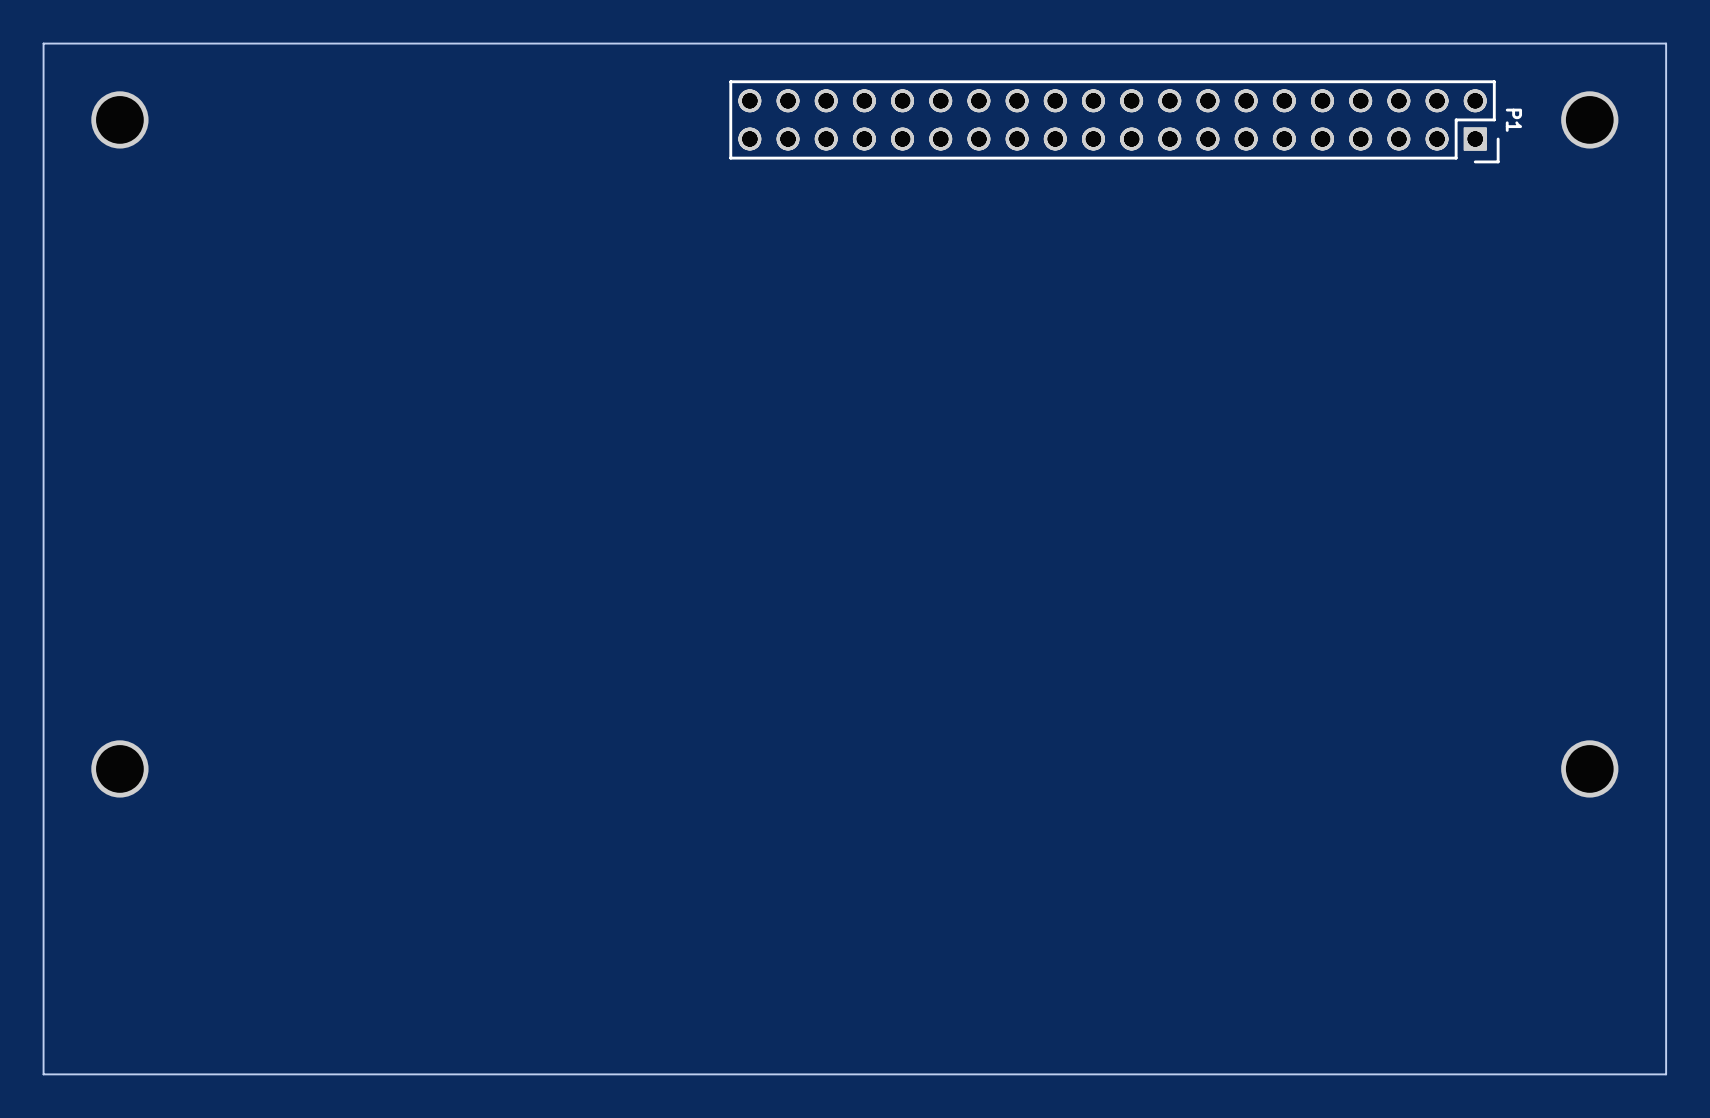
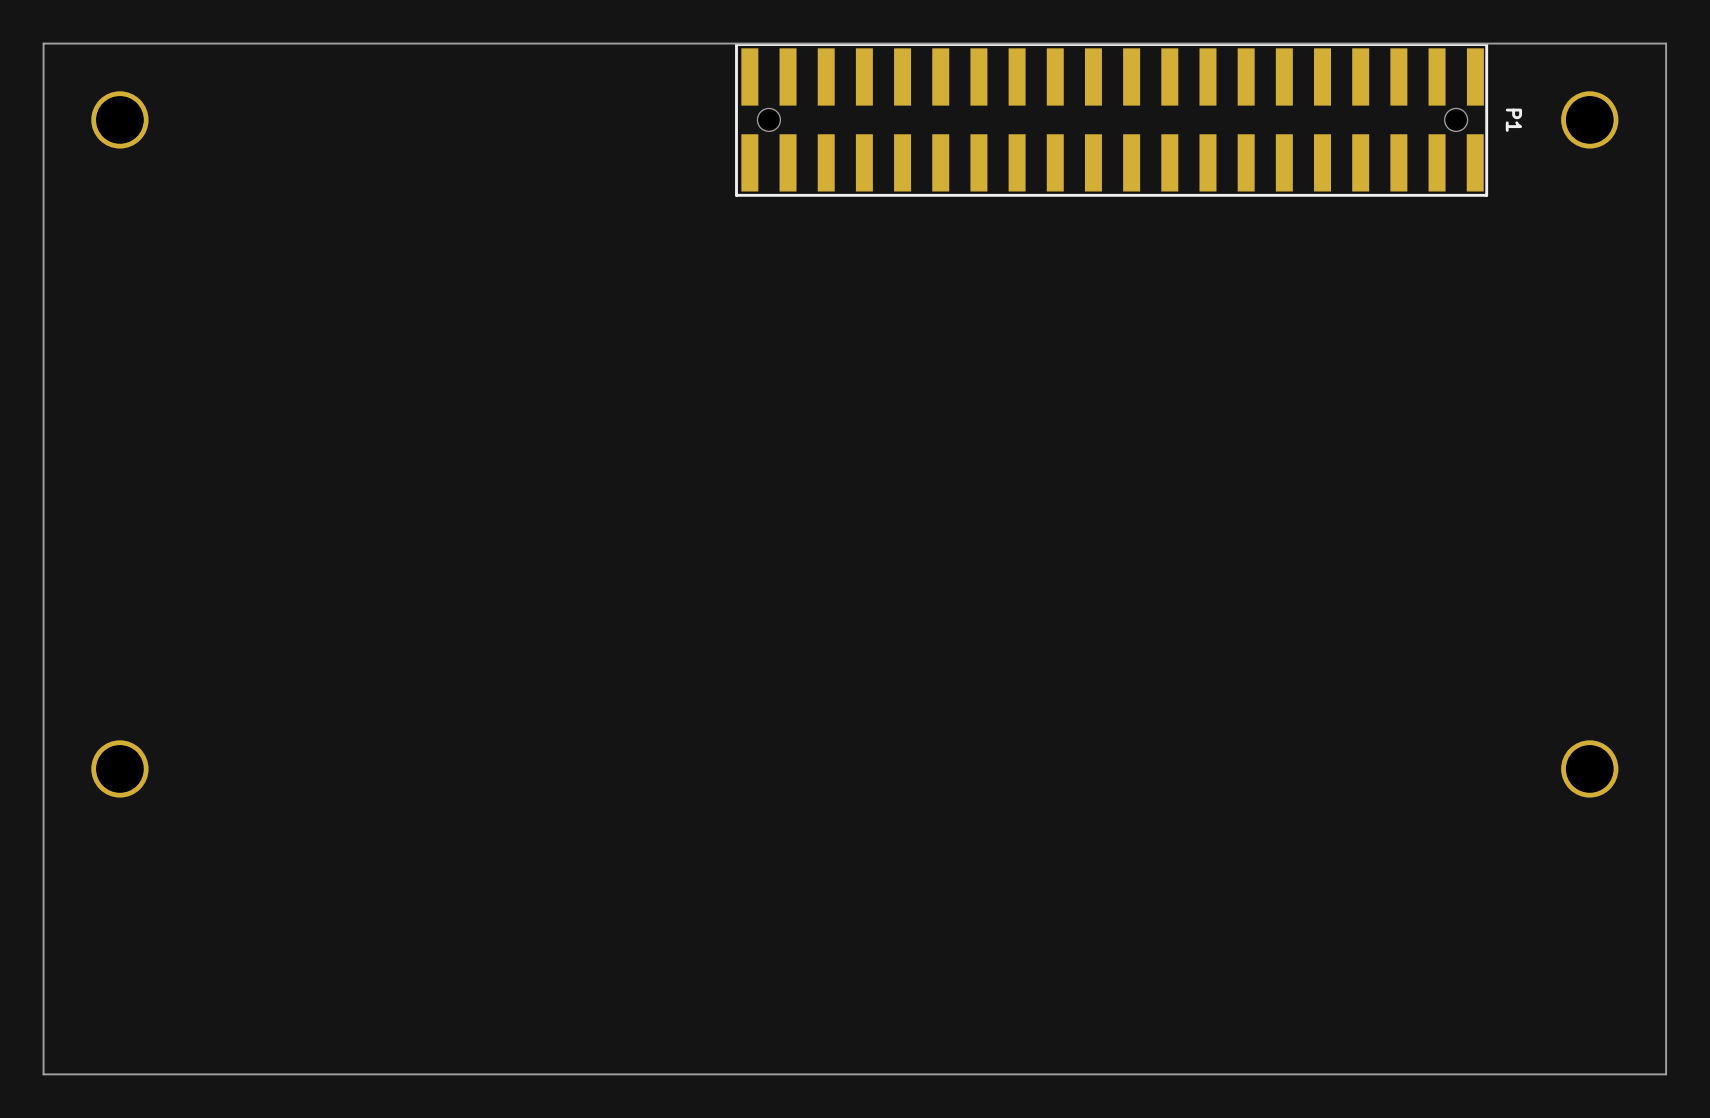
P1 footprint: [729, 80, 1500, 164] -> [735, 43, 1489, 197]
part: (1112, 119) -> none

